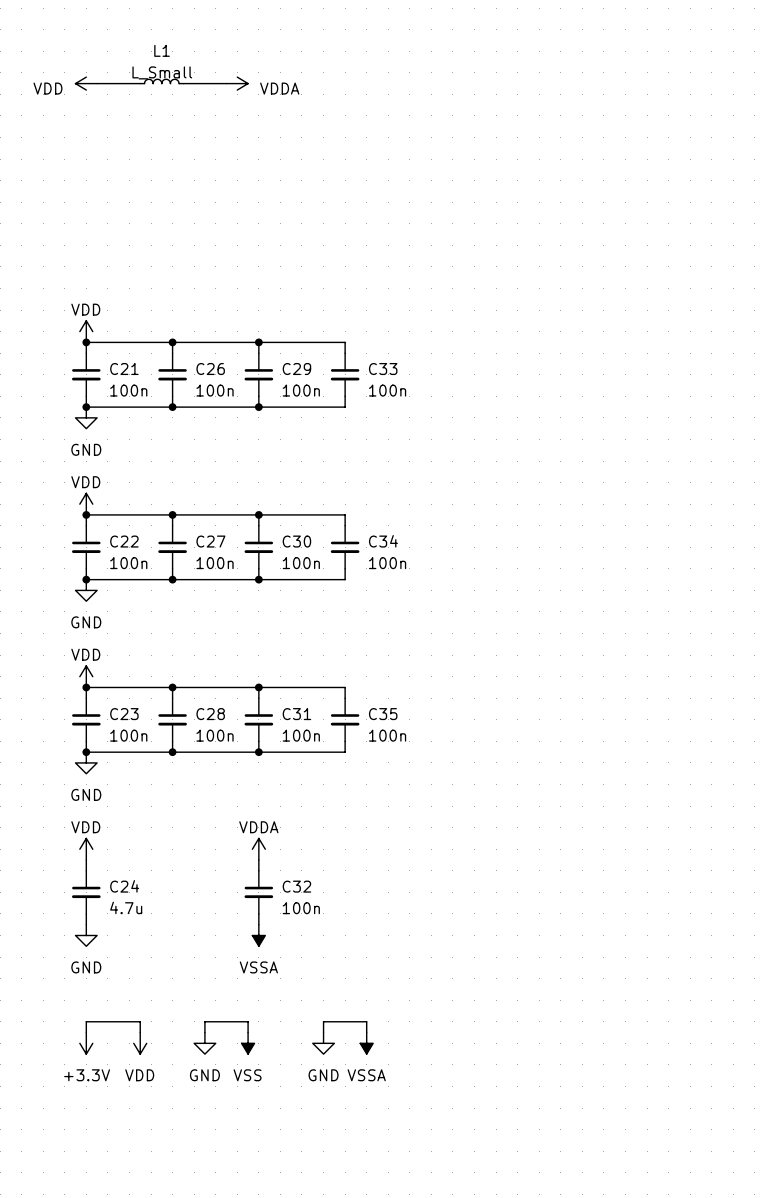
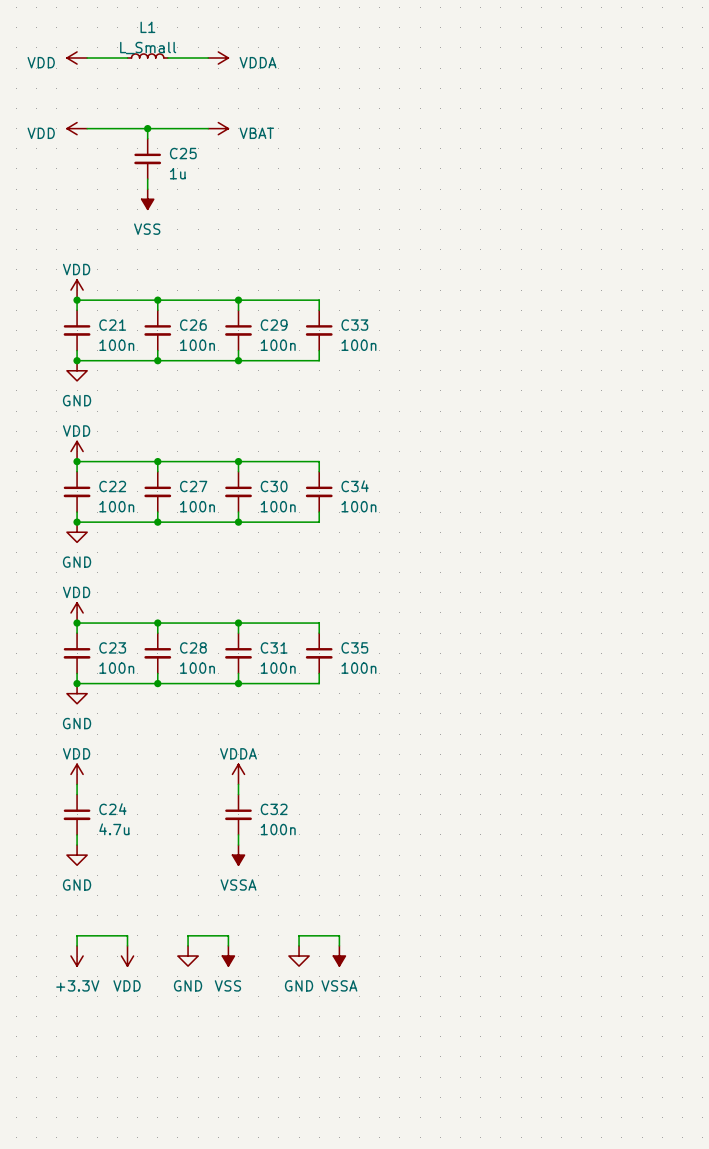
power symbol: none -> VDD (77, 128)
wire: none -> (87, 128) (208, 128)
wire: none -> (147, 128) (147, 138)
junction: none -> (147, 128)
power symbol: none -> VBAT (218, 128)
C25: none -> 1u (147, 158)
wire: none -> (147, 179) (147, 189)
power symbol: none -> VSS (147, 199)

